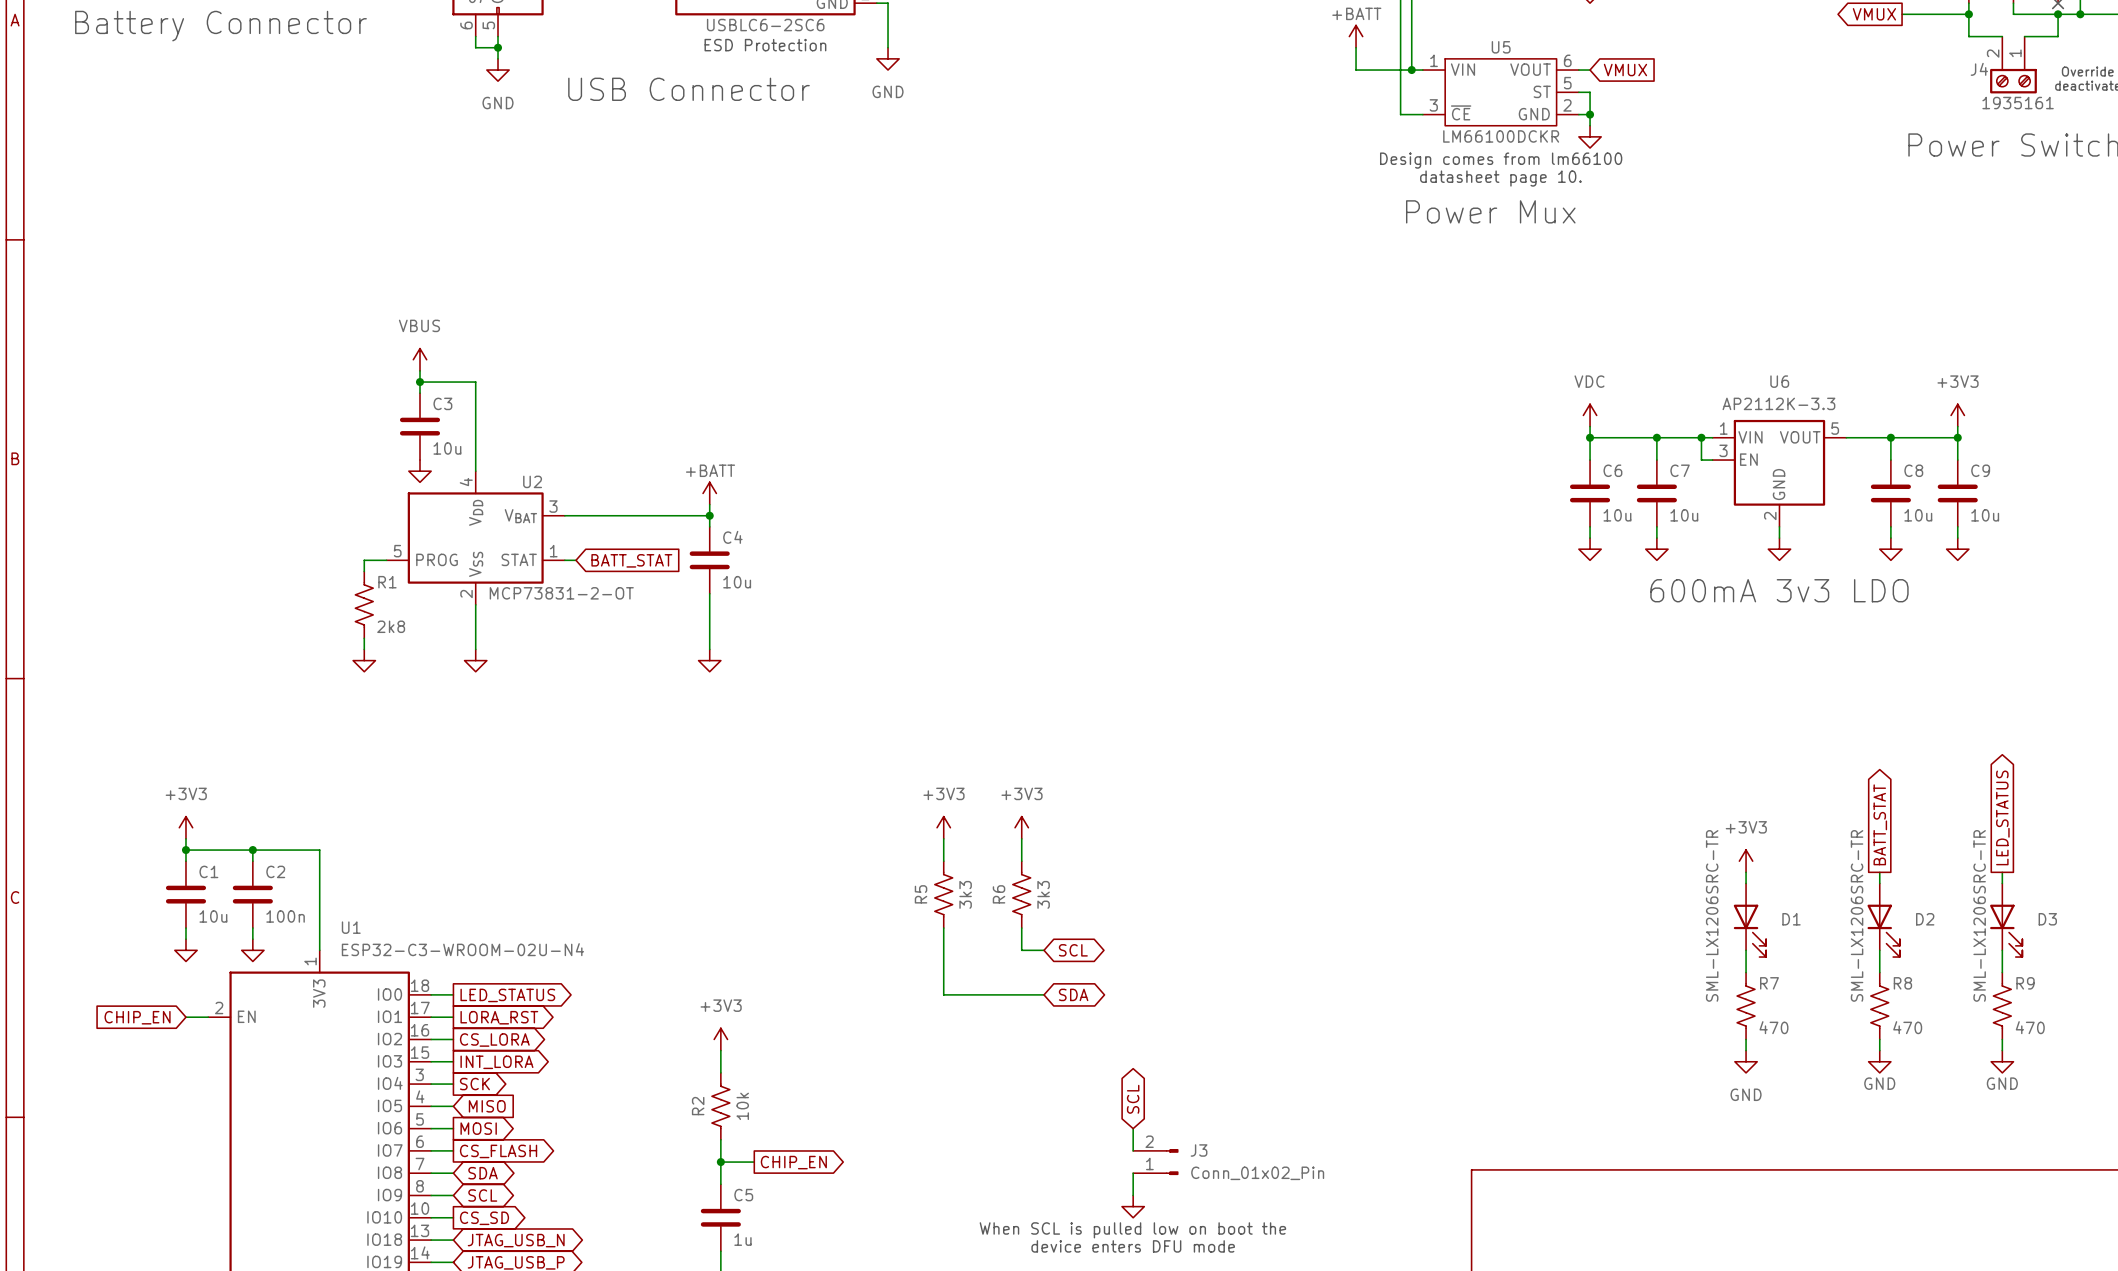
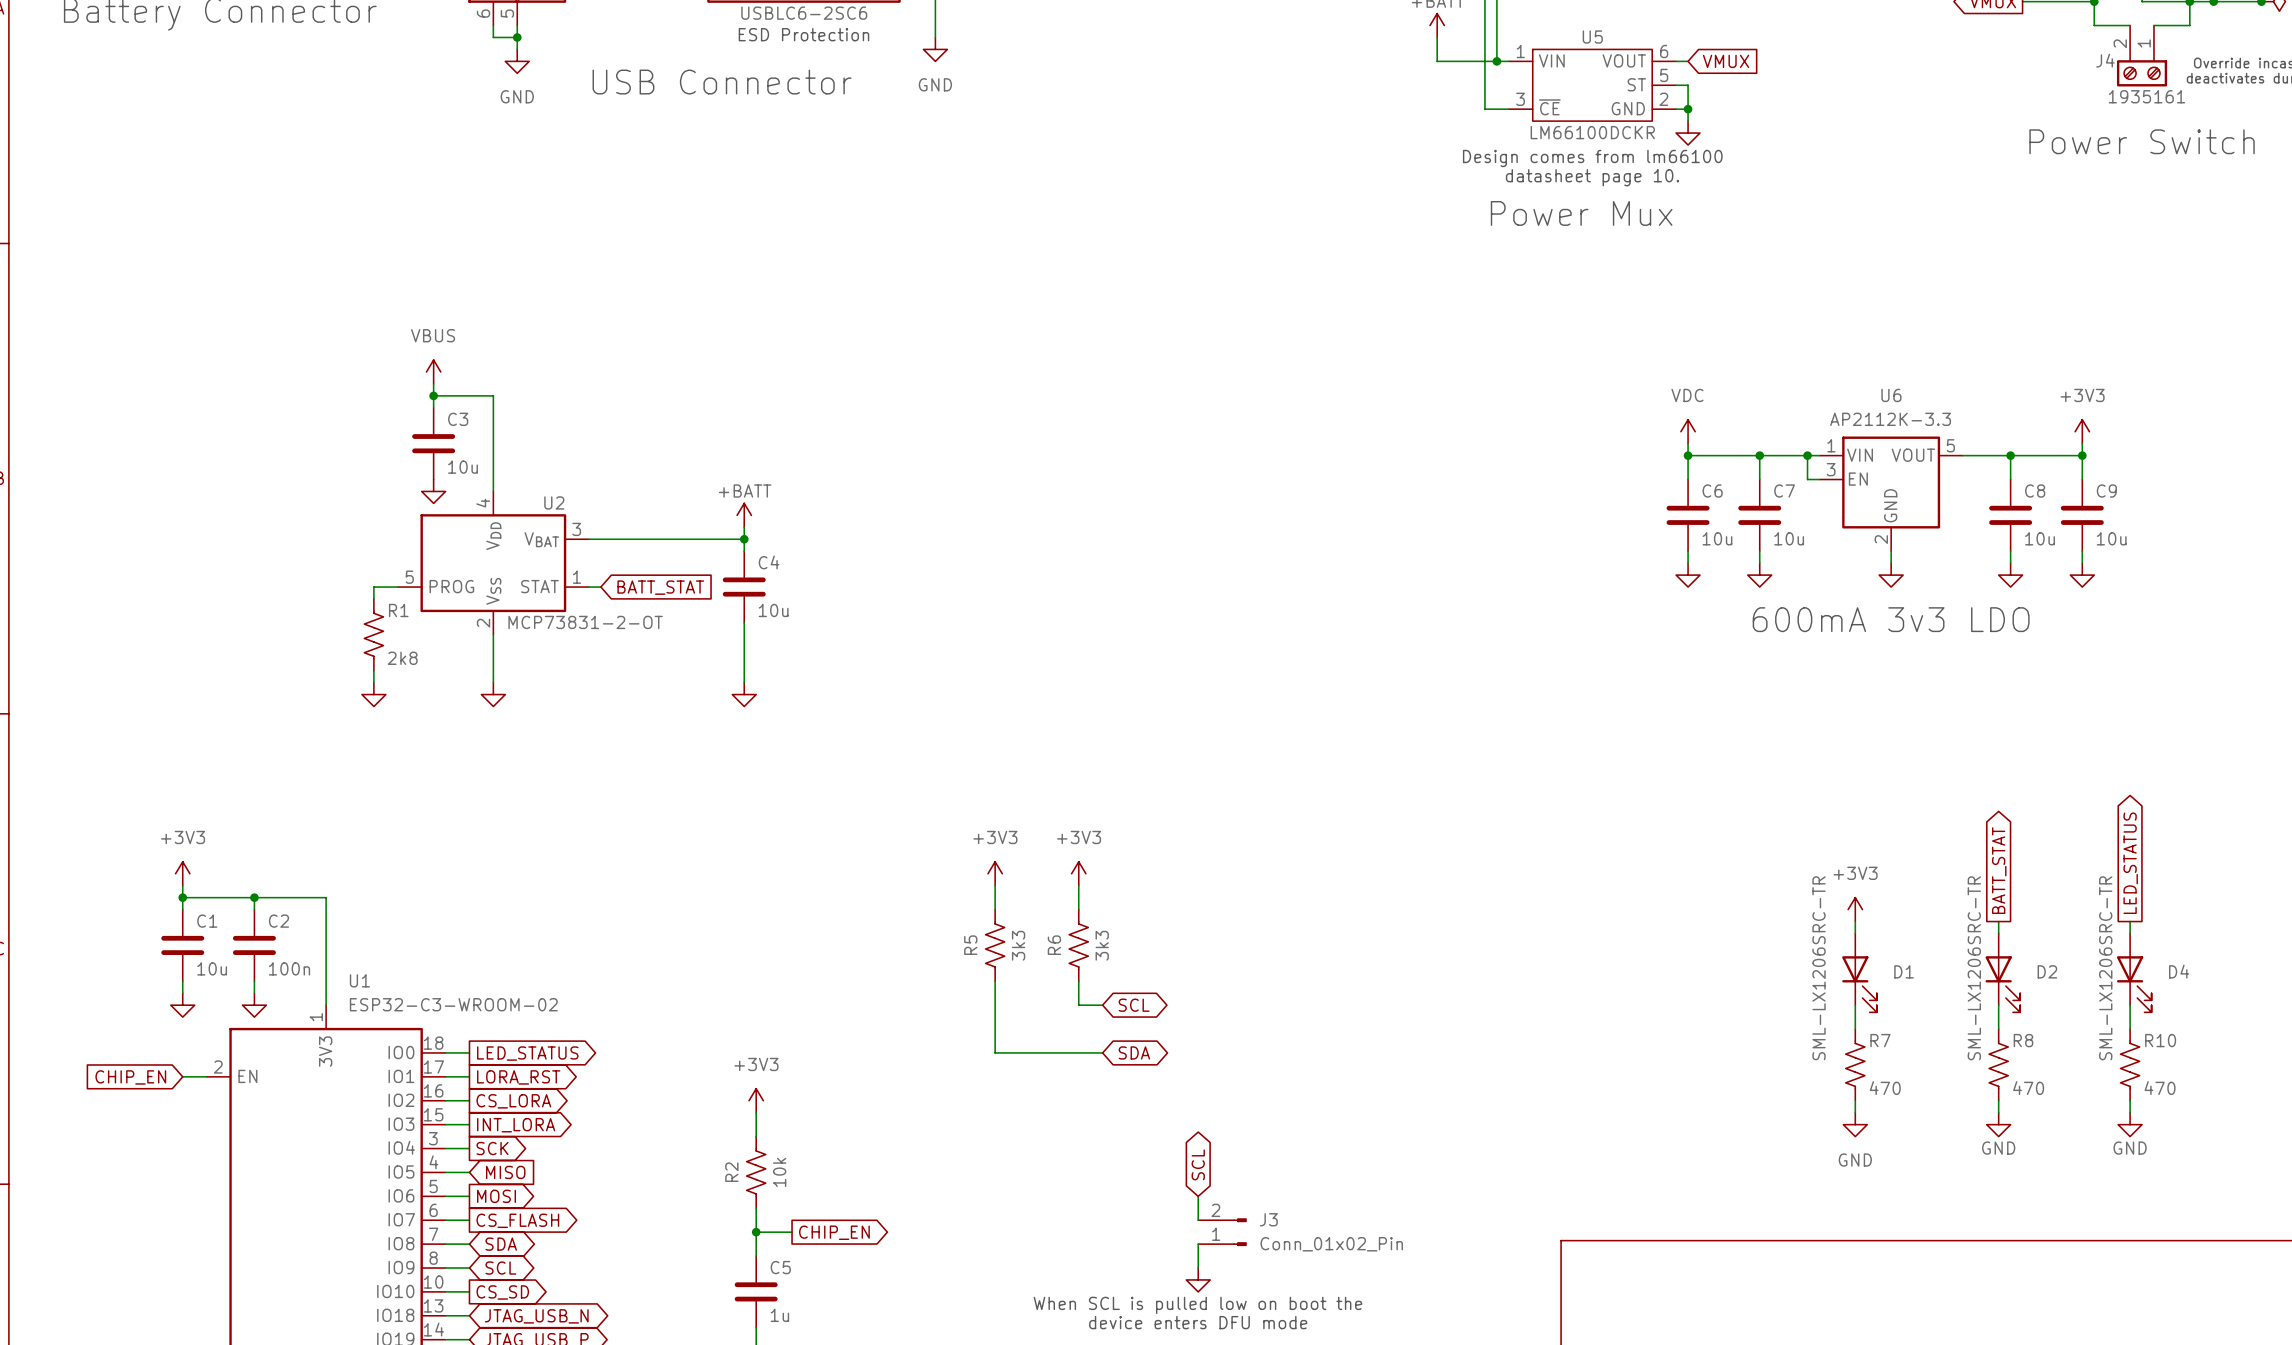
D3 name: D3 (2047, 919) -> D4 (2179, 971)
U1 value: ESP32-C3-WROOM-02U-N4 (462, 949) -> ESP32-C3-WROOM-02 (453, 1004)
R9 name: R9 (2025, 983) -> R10 (2160, 1040)

